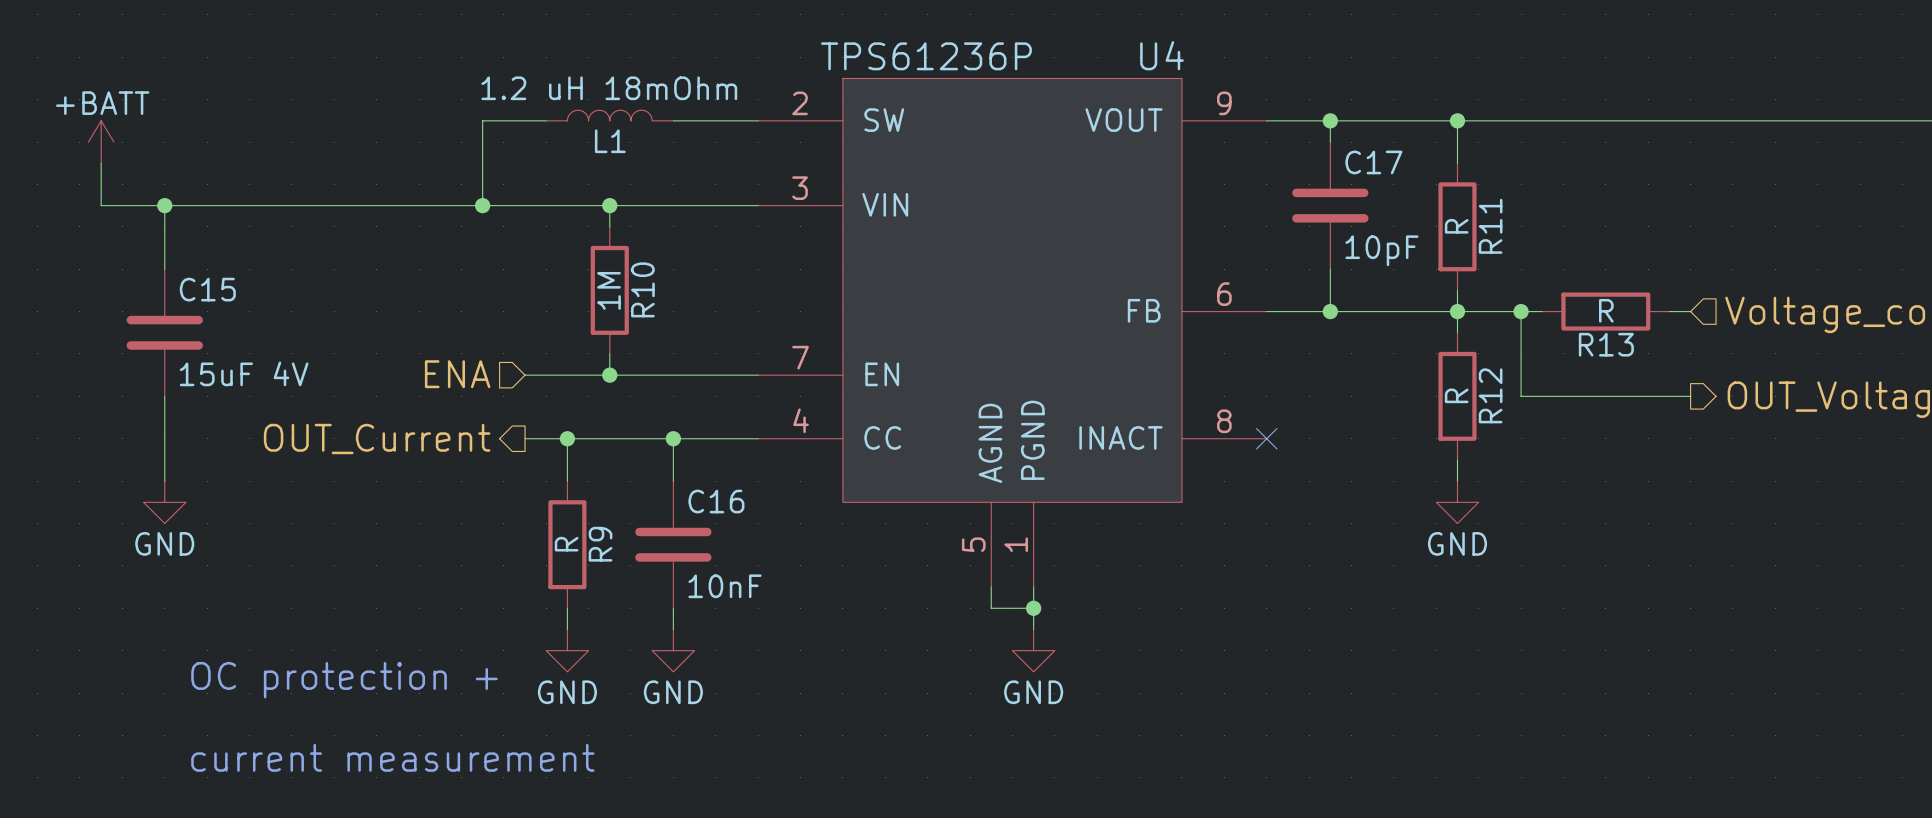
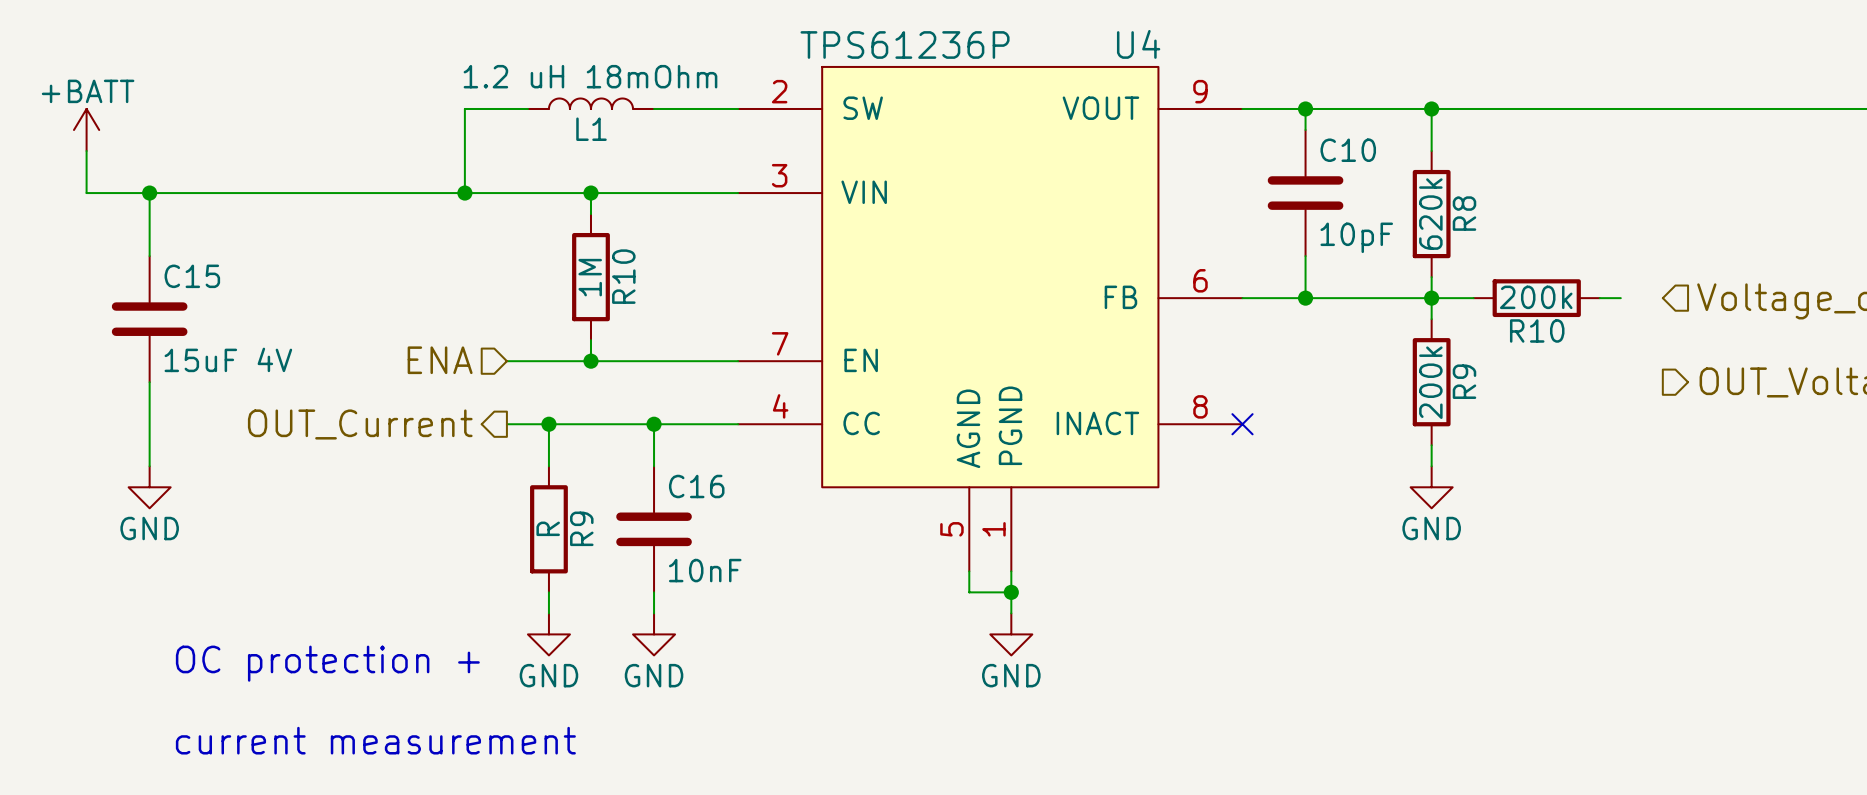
C17 name: C17 (1373, 162) -> C10 (1348, 150)
R11 value: R (1456, 226) -> 620k (1430, 214)
R11 name: R11 (1490, 226) -> R8 (1464, 213)
wire: (1521, 311) (1521, 396) (1690, 396) -> none
junction: (1521, 311) -> none
R10: none -> 200k (1536, 298)
R13: R (1605, 311) -> none
wire: (1669, 311) (1690, 311) -> (1599, 298) (1620, 298)
R12 value: R (1456, 395) -> 200k (1430, 382)
R12 name: R12 (1490, 395) -> R9 (1464, 381)

